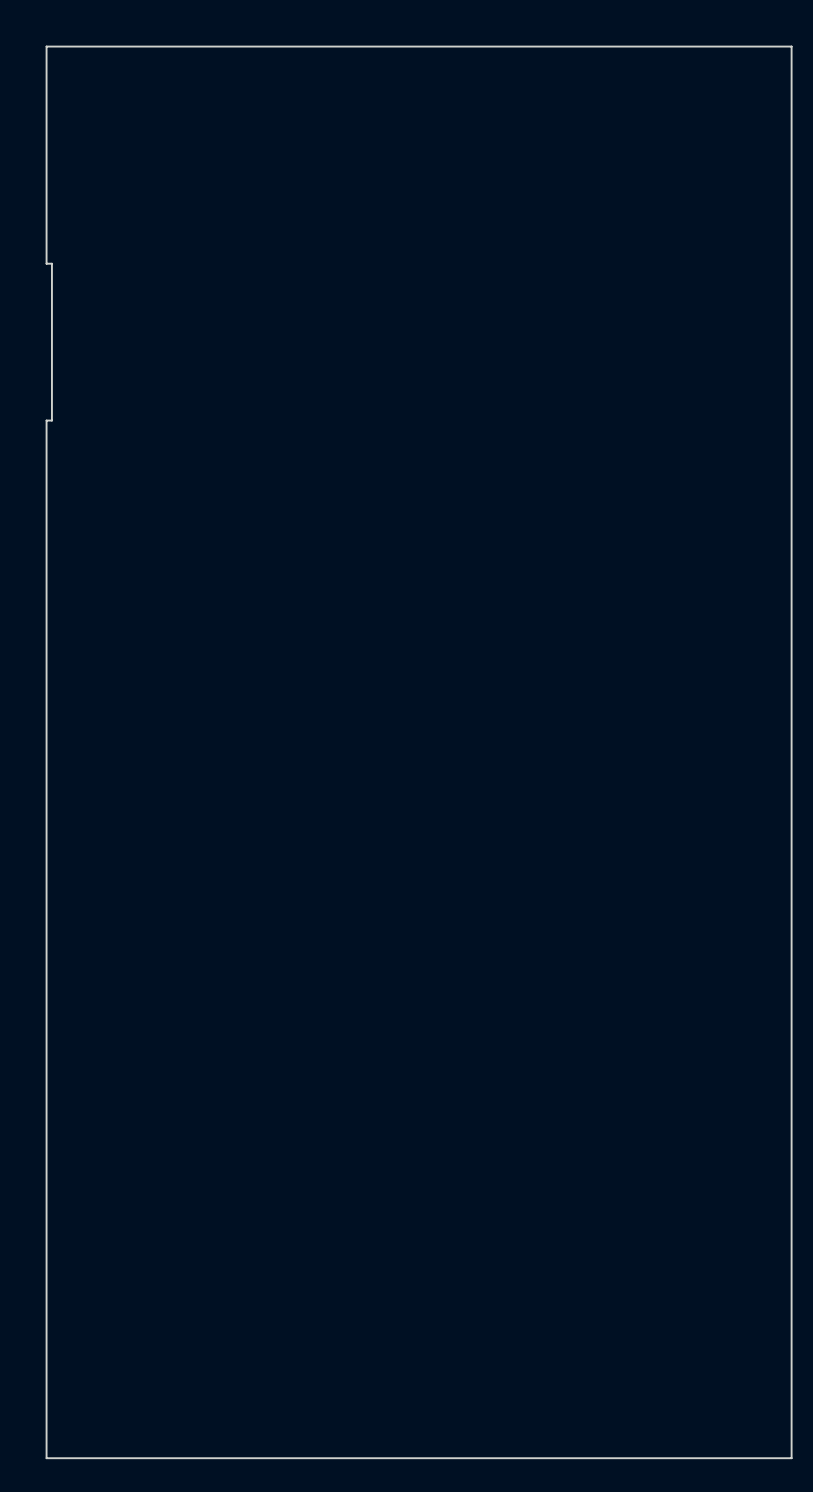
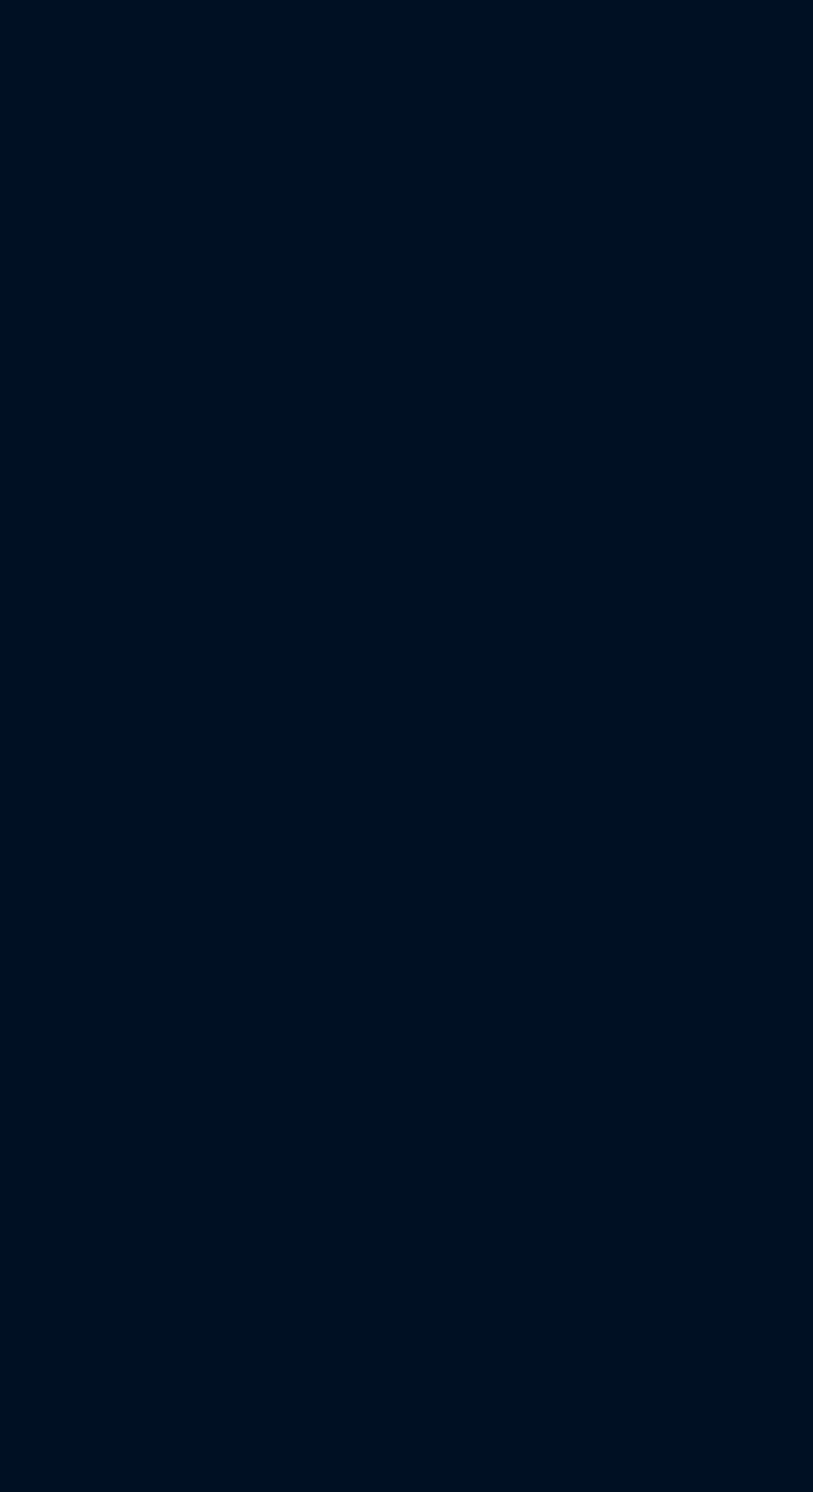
board edge: (46, 46) (791, 46) (791, 1458) (46, 1458) (46, 420) (51, 420) (51, 263) (46, 263) (46, 46) -> none

